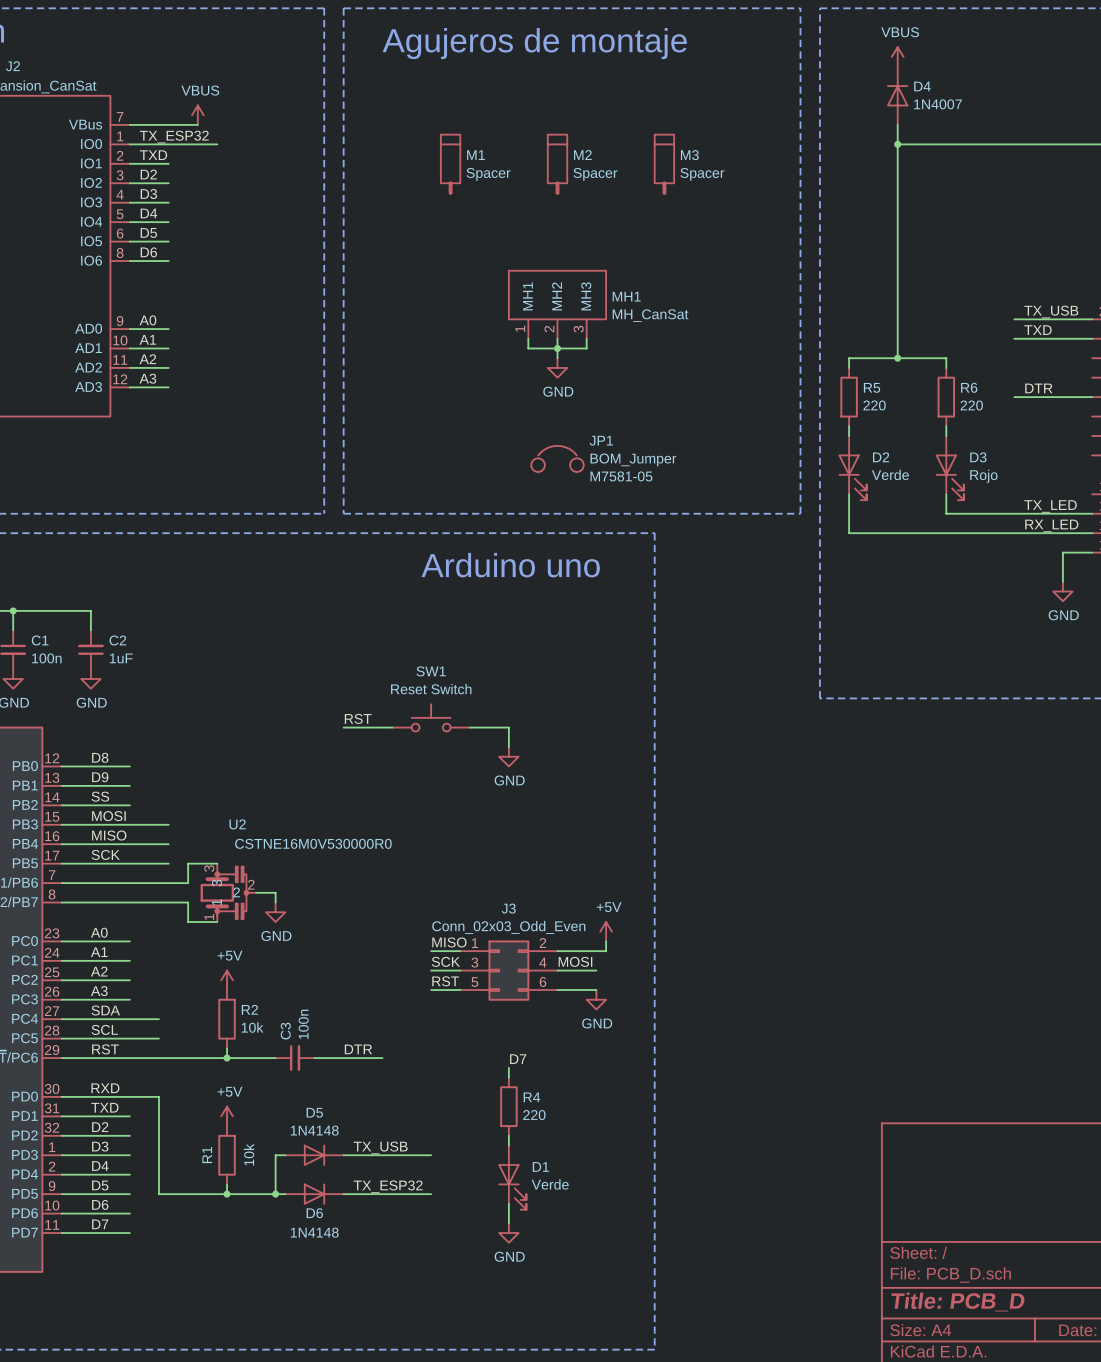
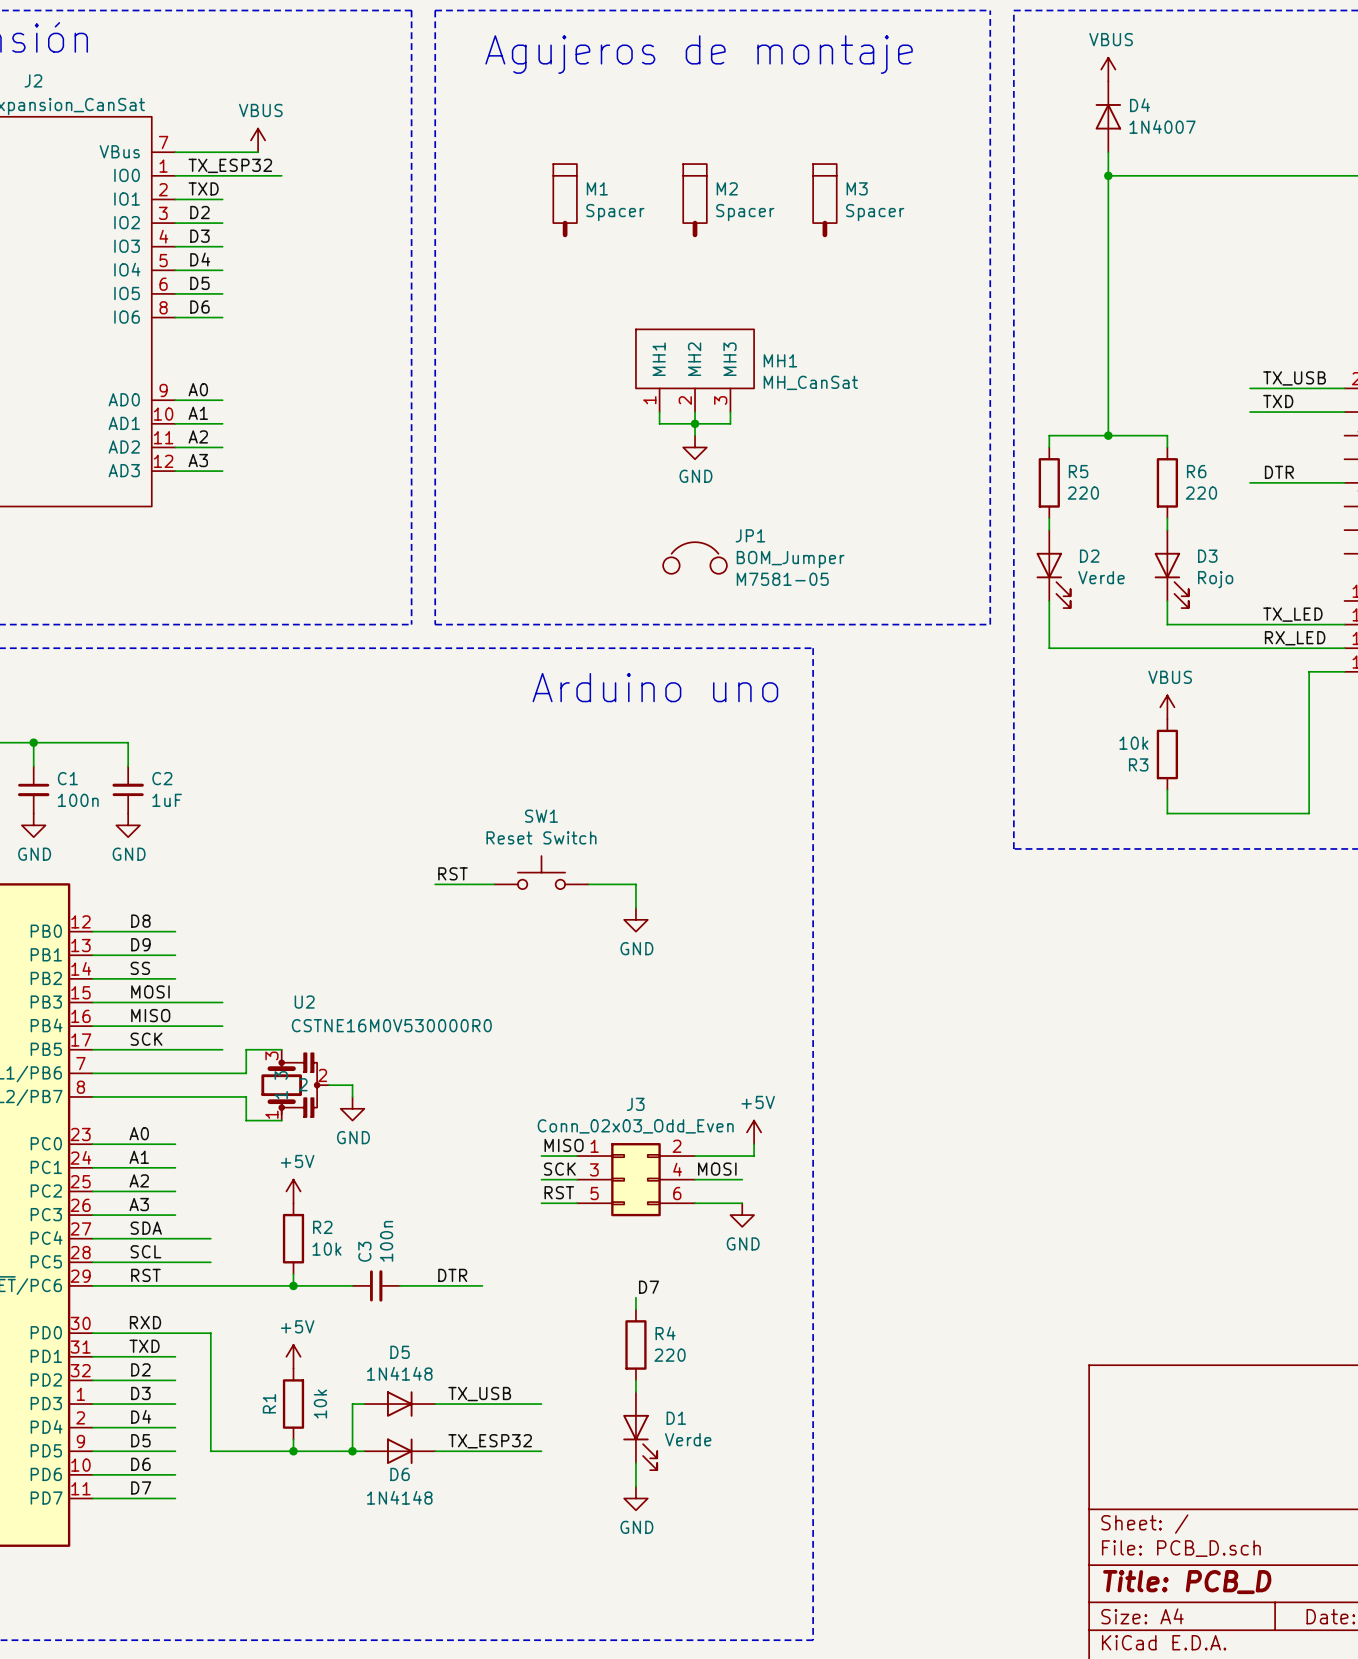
power symbol: none -> VBUS (1167, 707)
wire: none -> (1309, 707) (1309, 813) (1167, 813) (1167, 789)
power symbol: GND (1062, 591) -> none
R3: none -> 10k (1167, 754)

